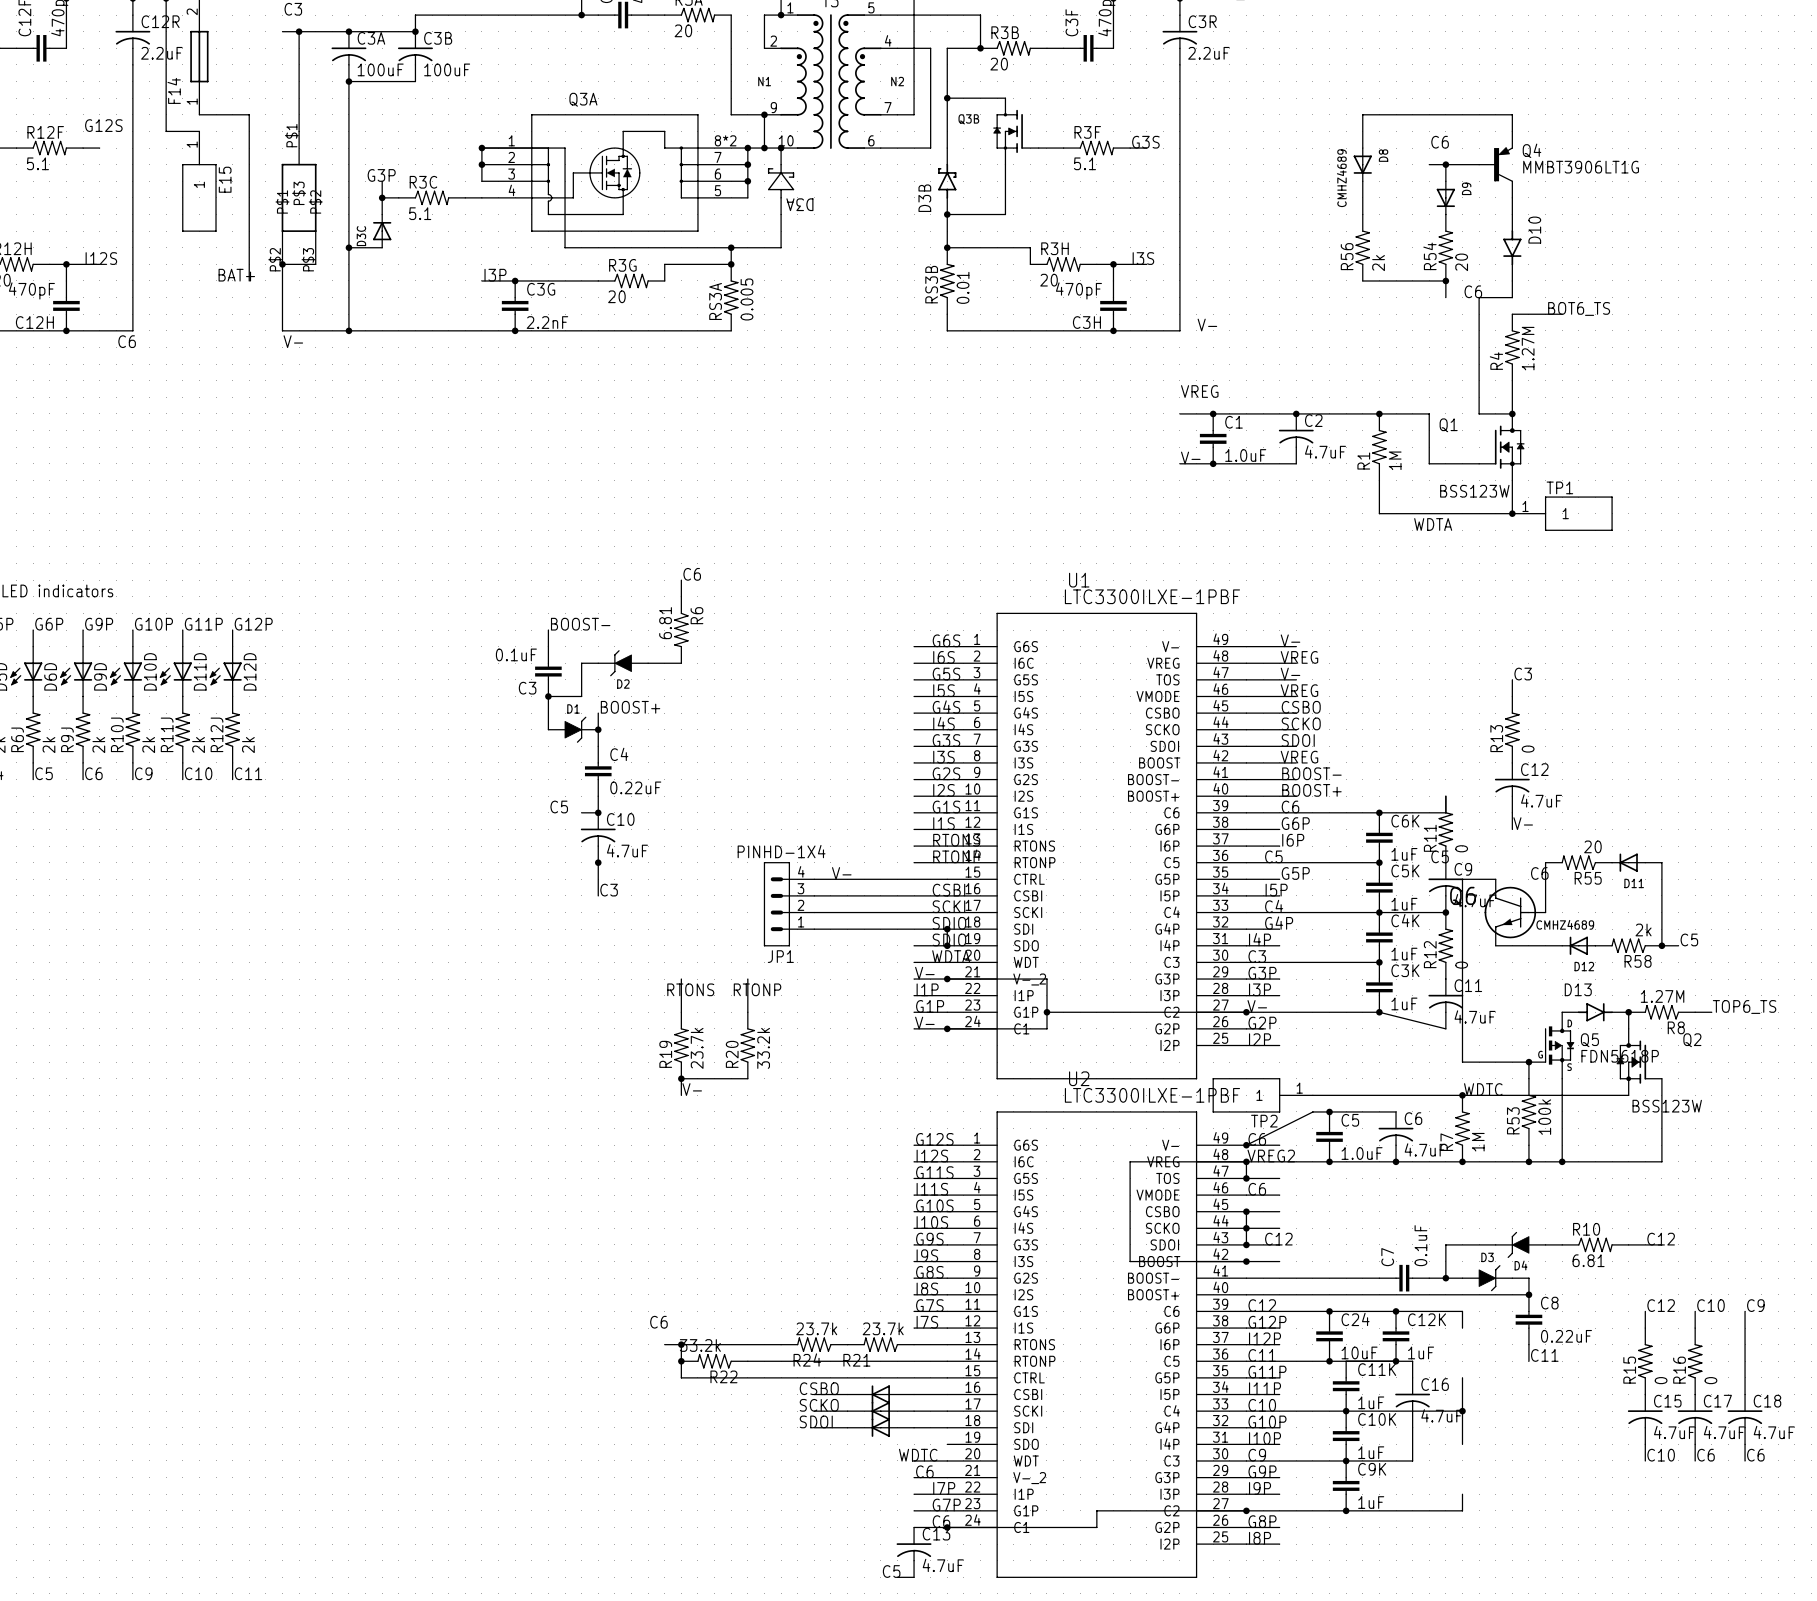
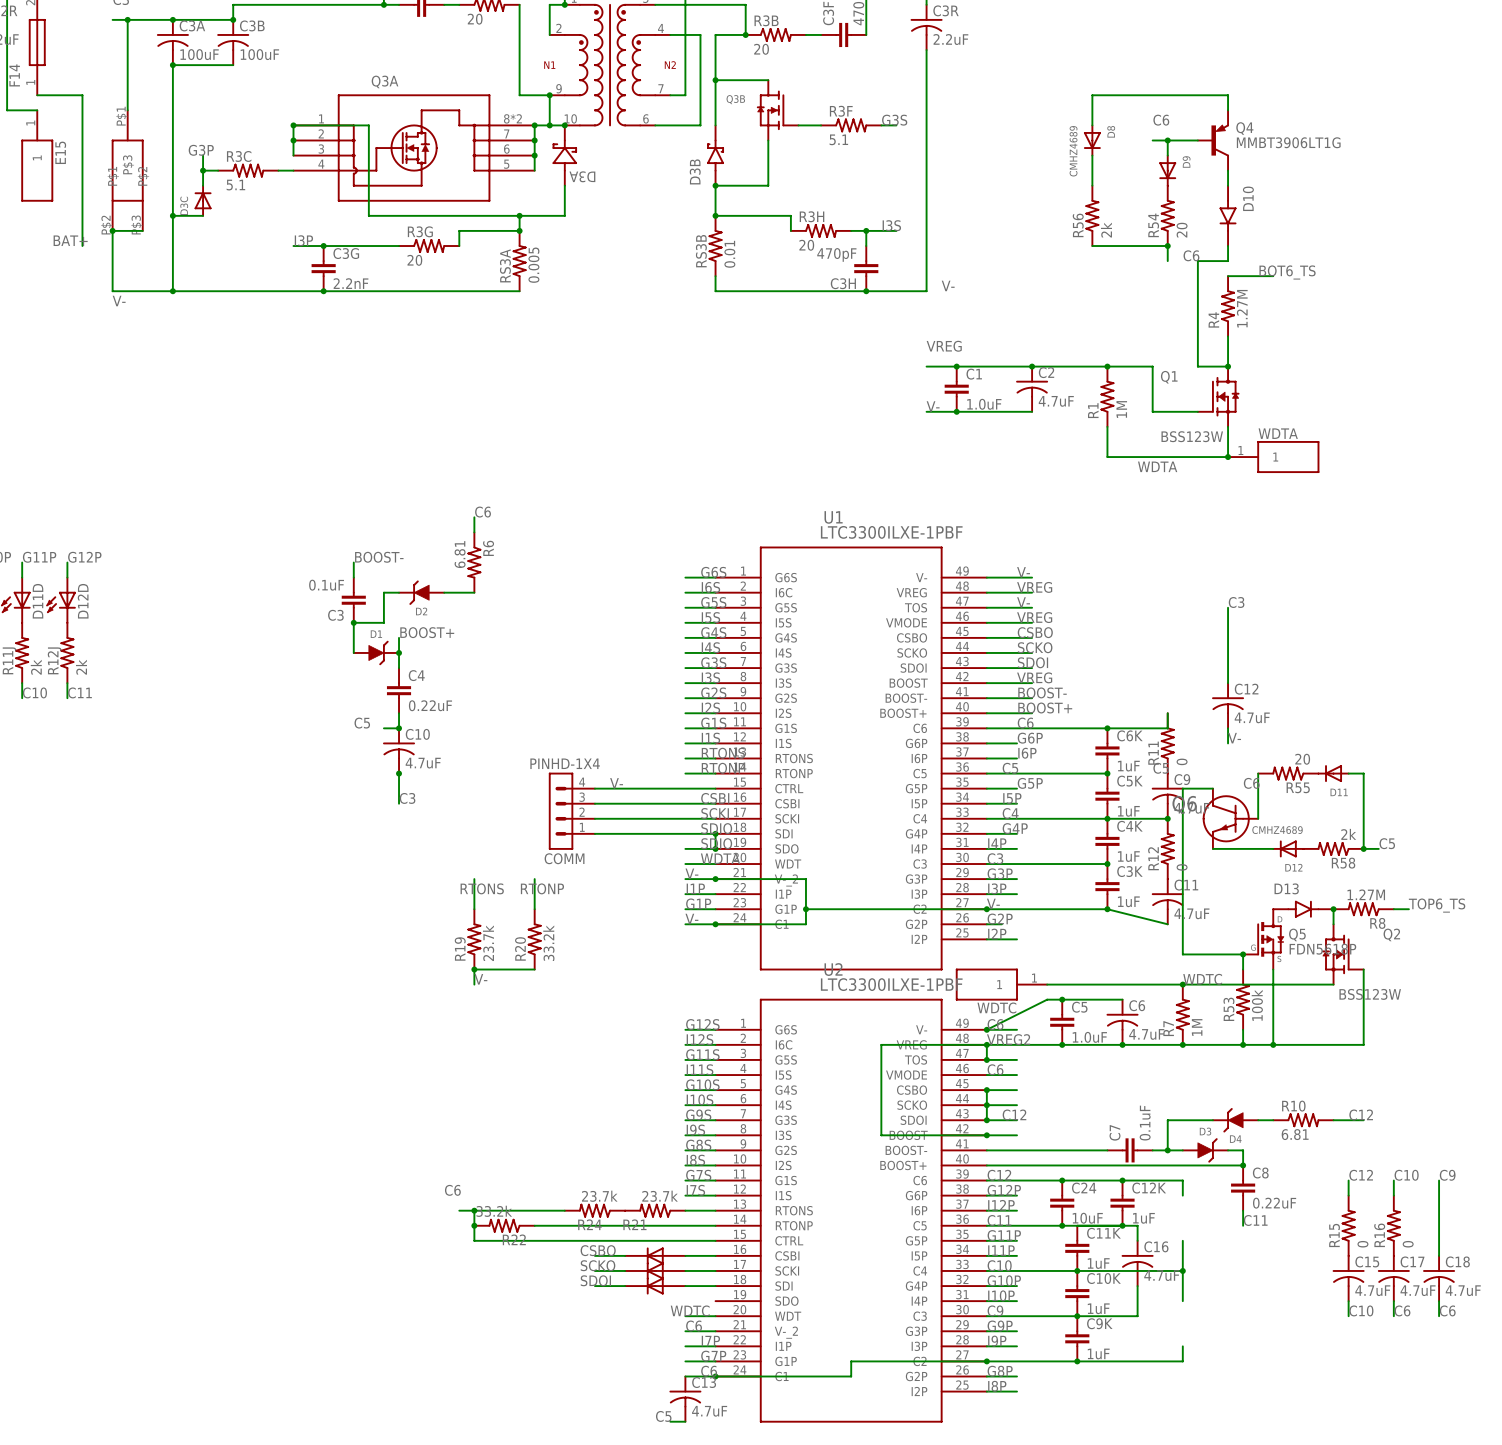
TP1 name: TP1 (1559, 487) -> WDTA (1278, 433)
R13: 0 (1512, 729) -> none
JP1 name: JP1 (780, 956) -> COMM (564, 858)
TP2 name: TP2 (1264, 1121) -> WDTC (996, 1007)

